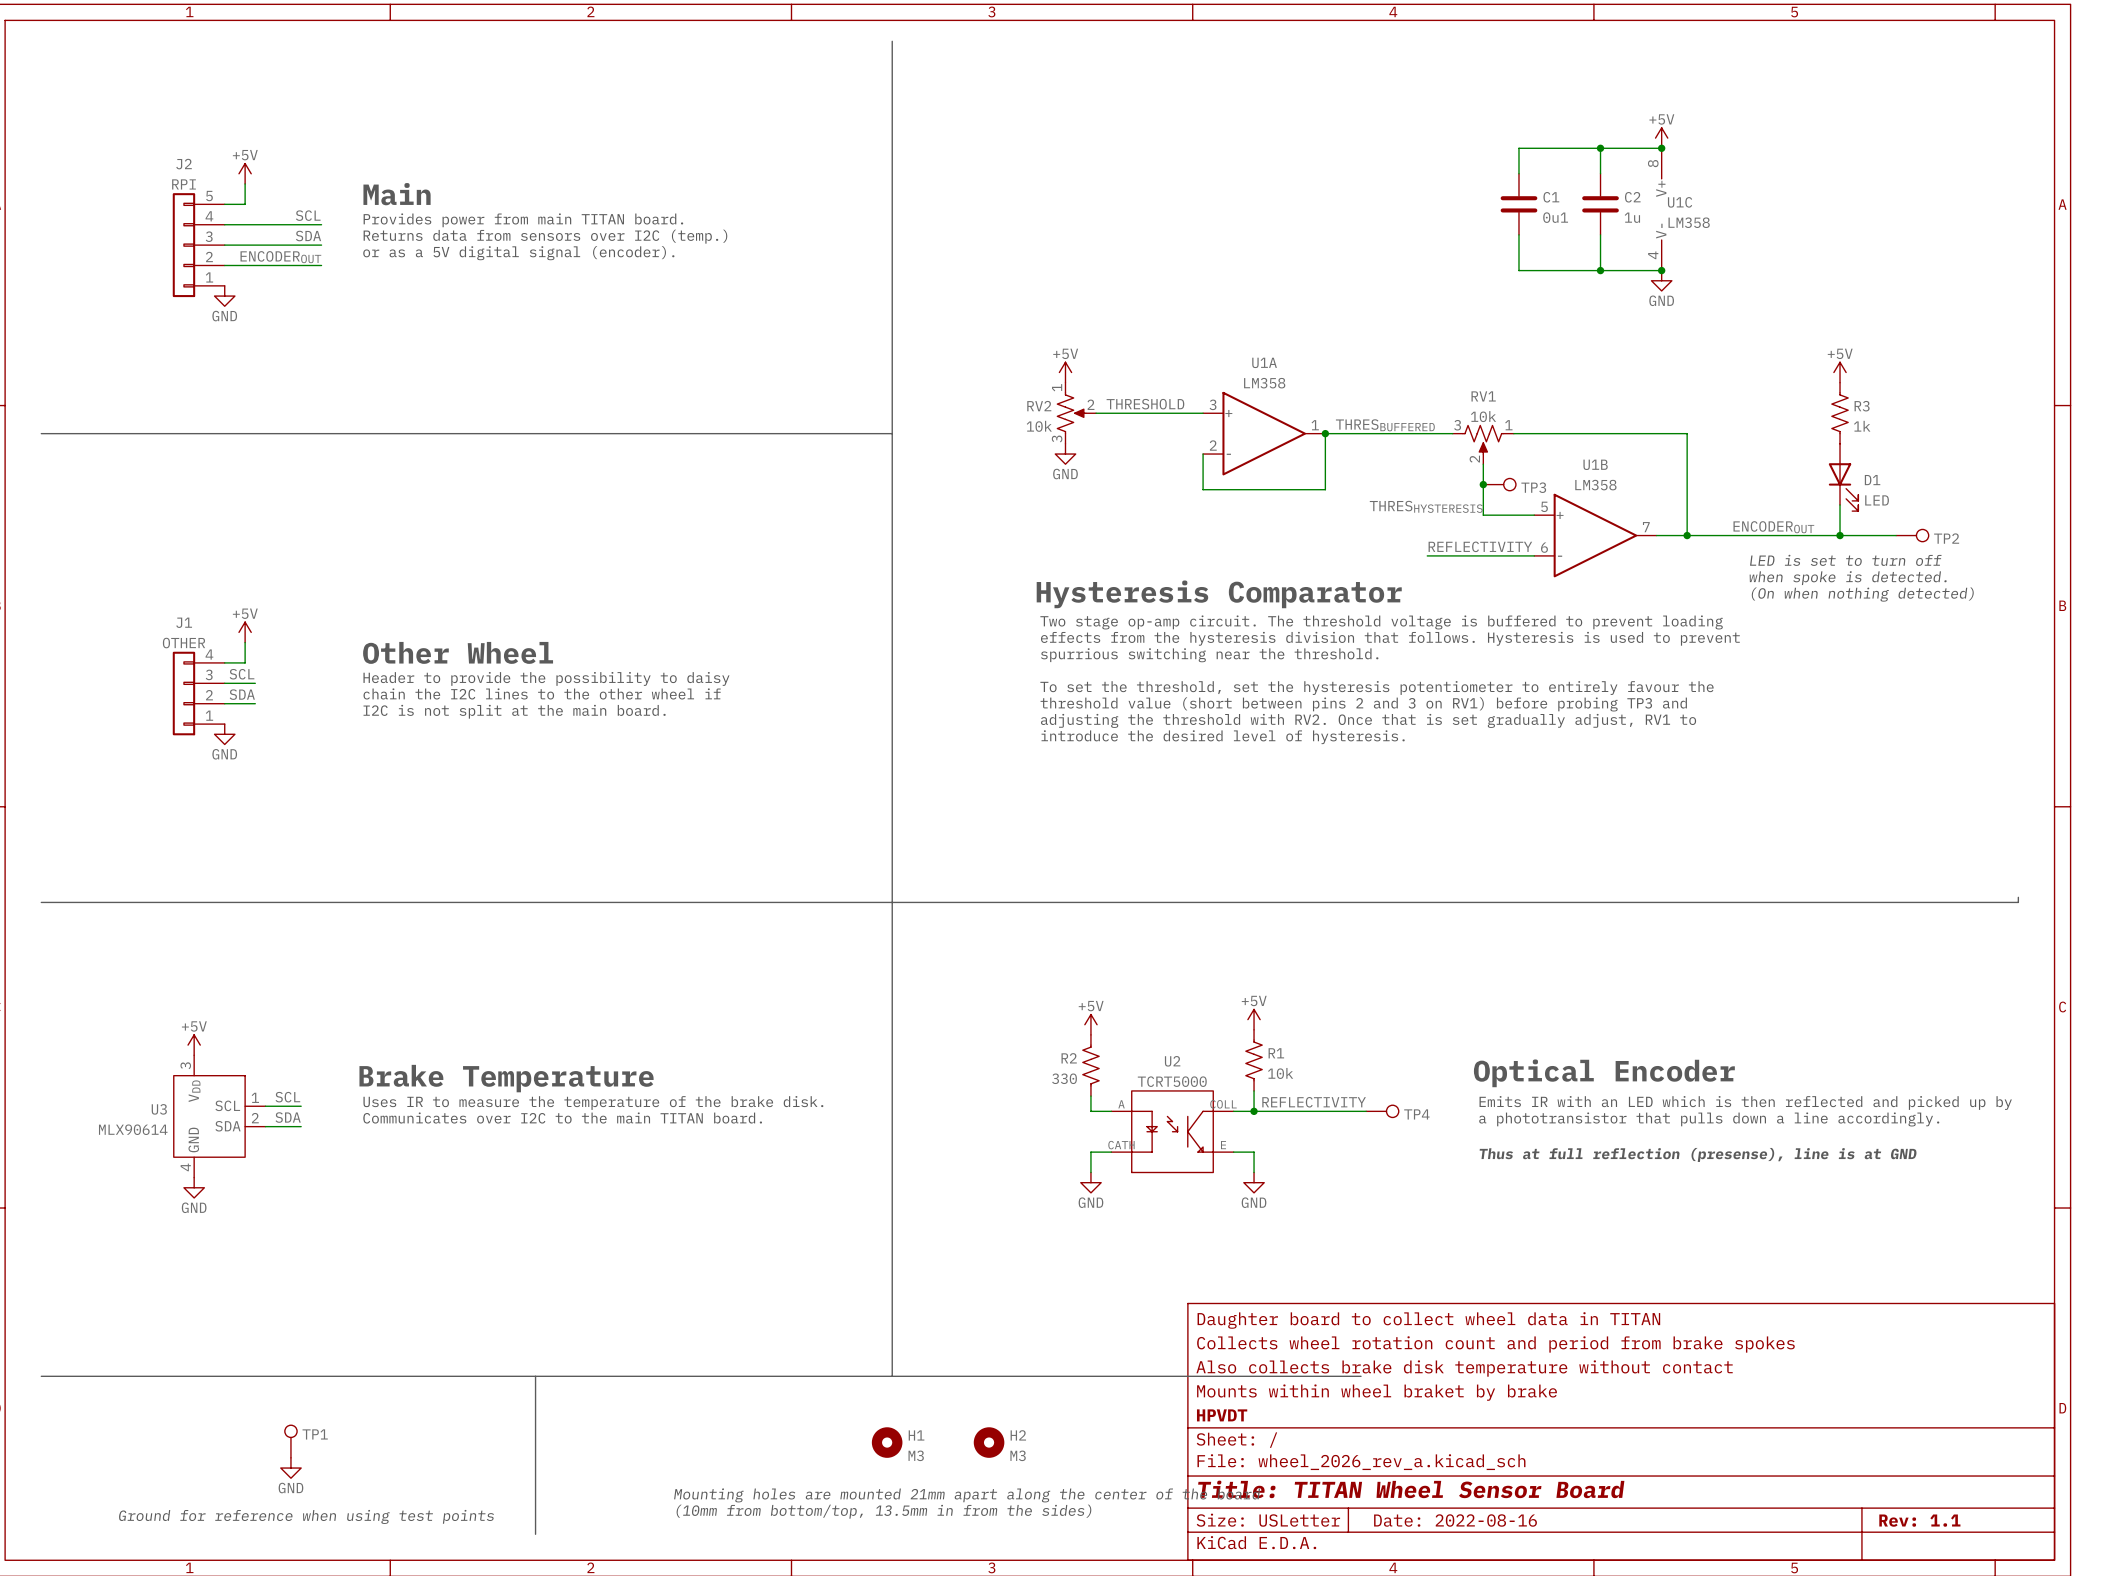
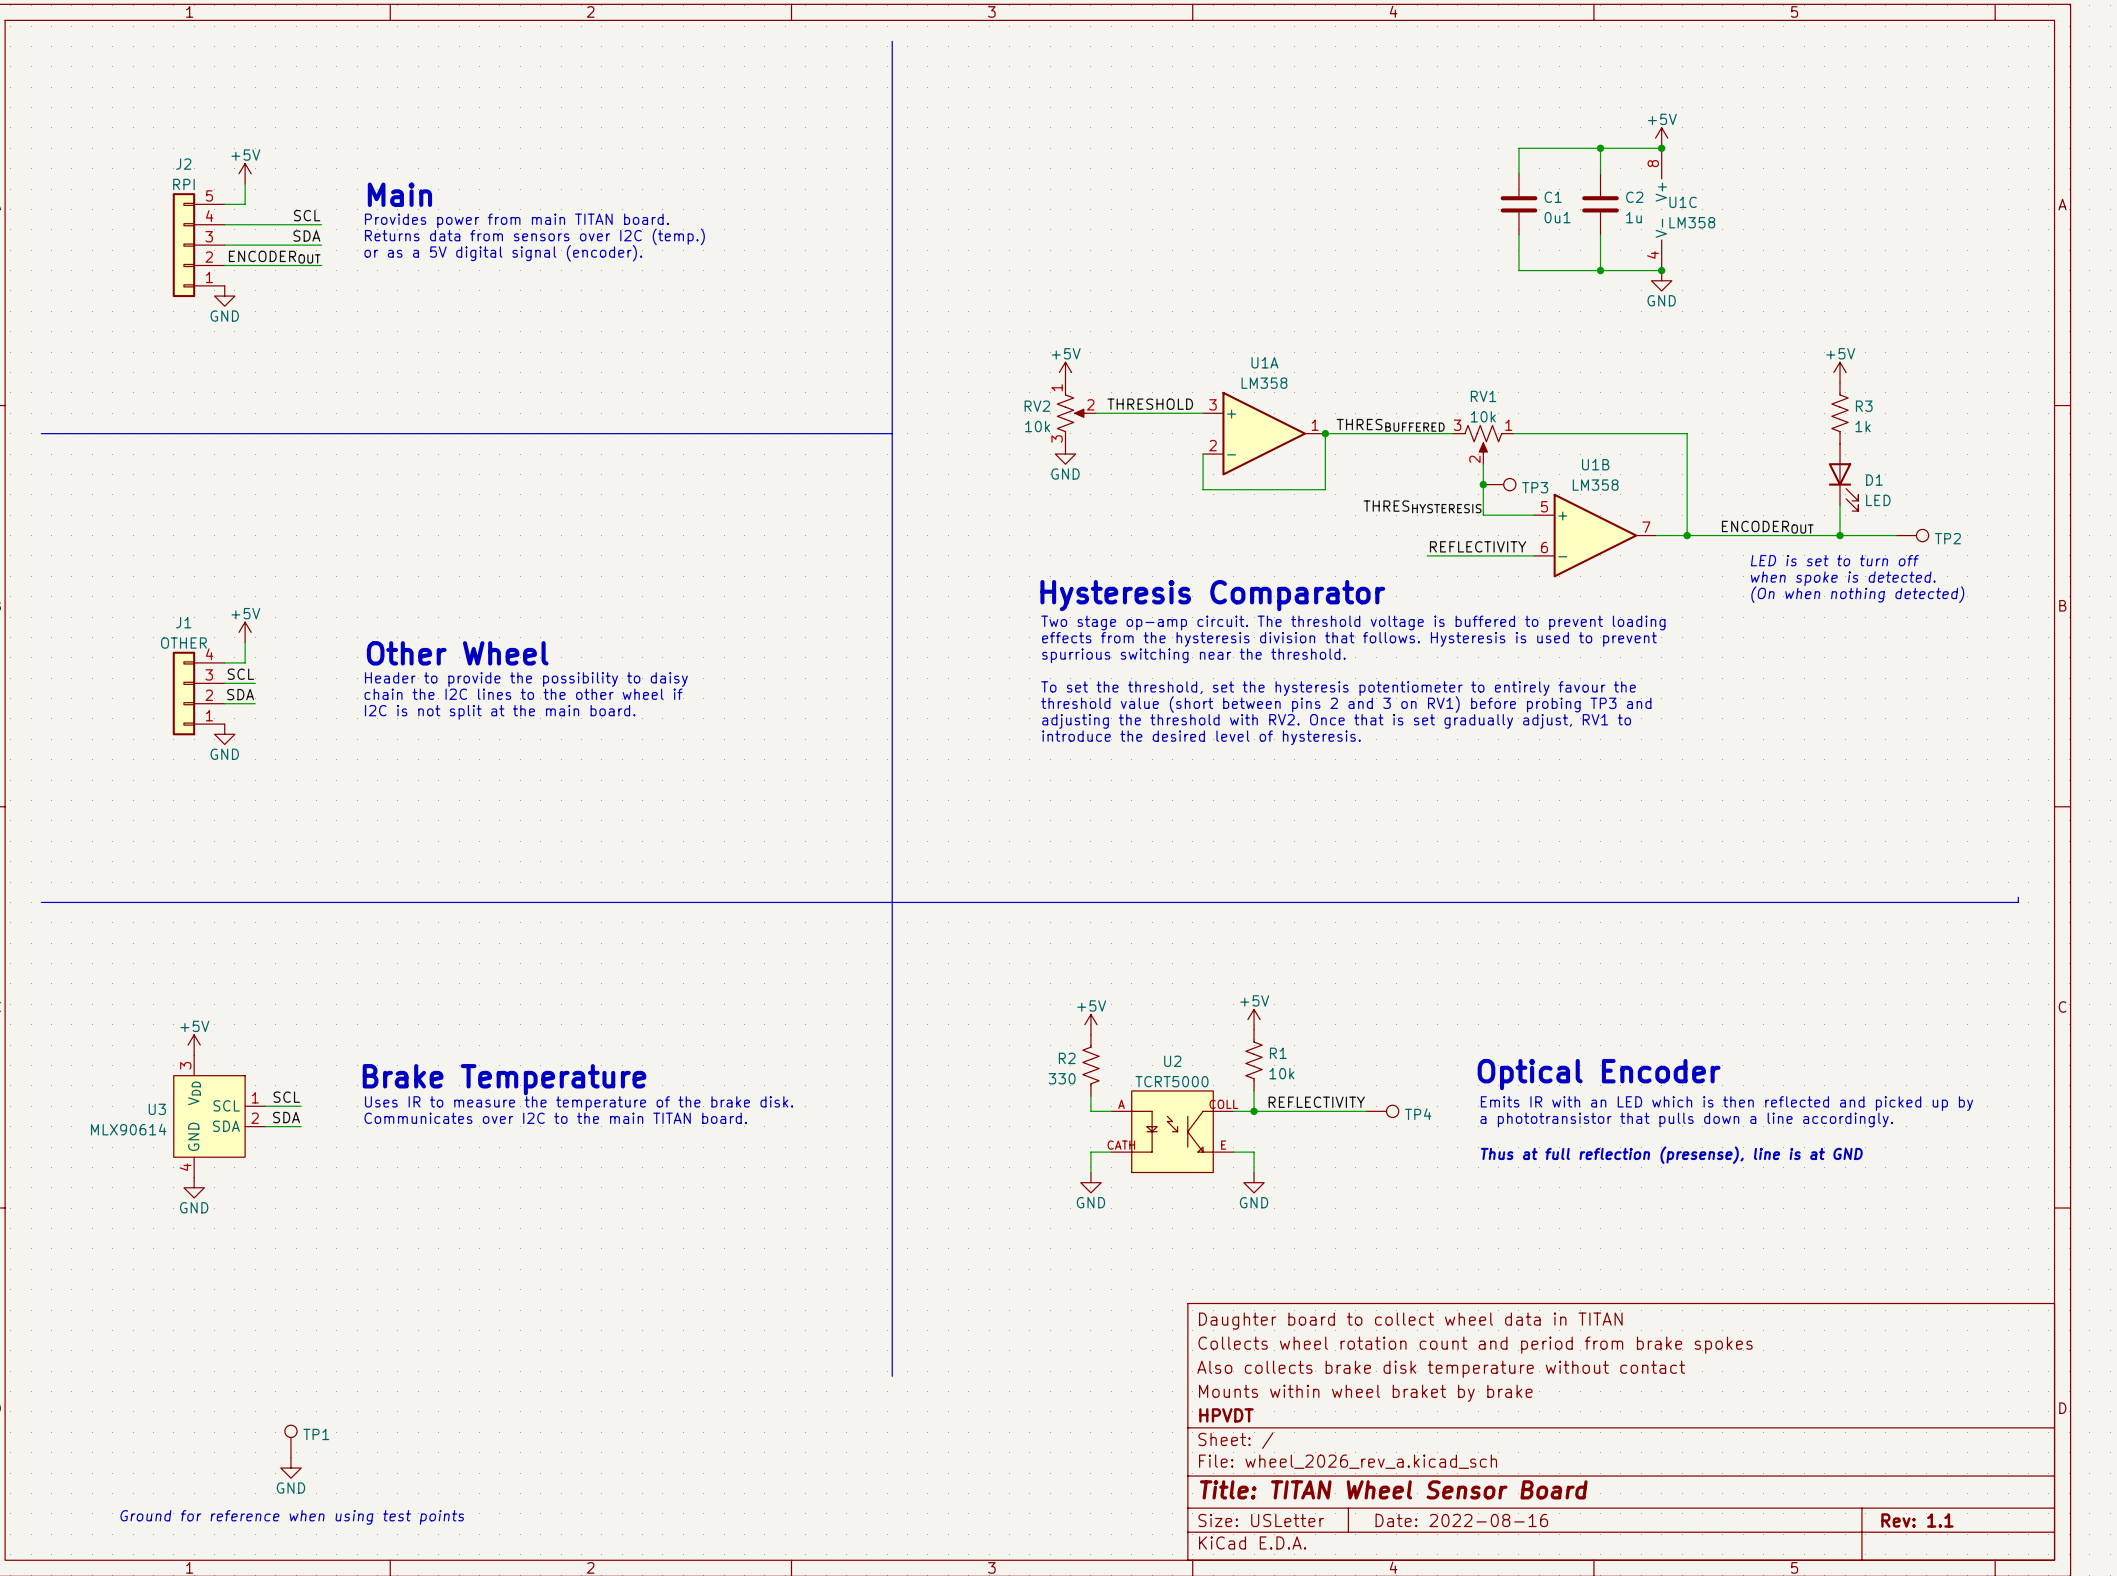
line: (41, 1376) (1361, 1376) -> none
line: (535, 1376) (535, 1534) -> none
H1: M3 (887, 1442) -> none
H2: M3 (989, 1442) -> none
text: Mounting holes are mounted 21mm apart along the center of the board (967, 1495) -> none
text: (10mm from bottom/top, 13.5mm in from the sides) (883, 1511) -> none

